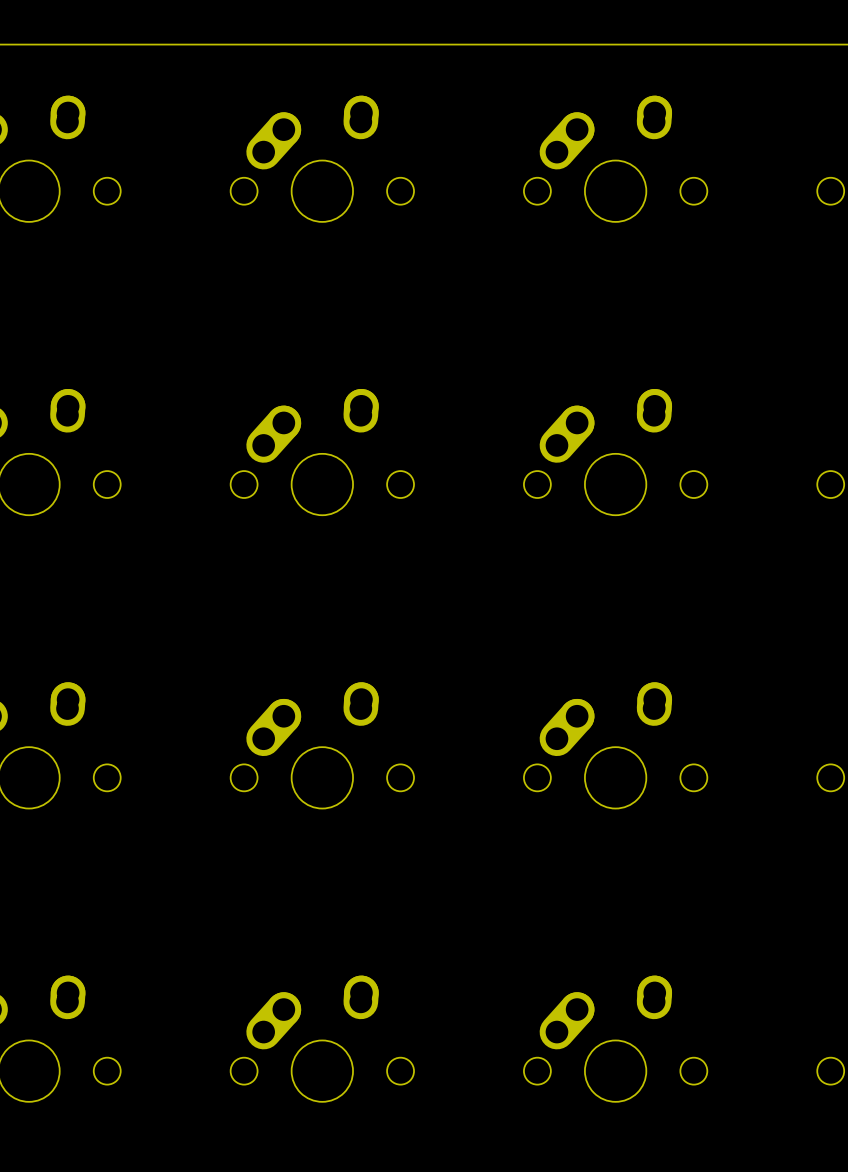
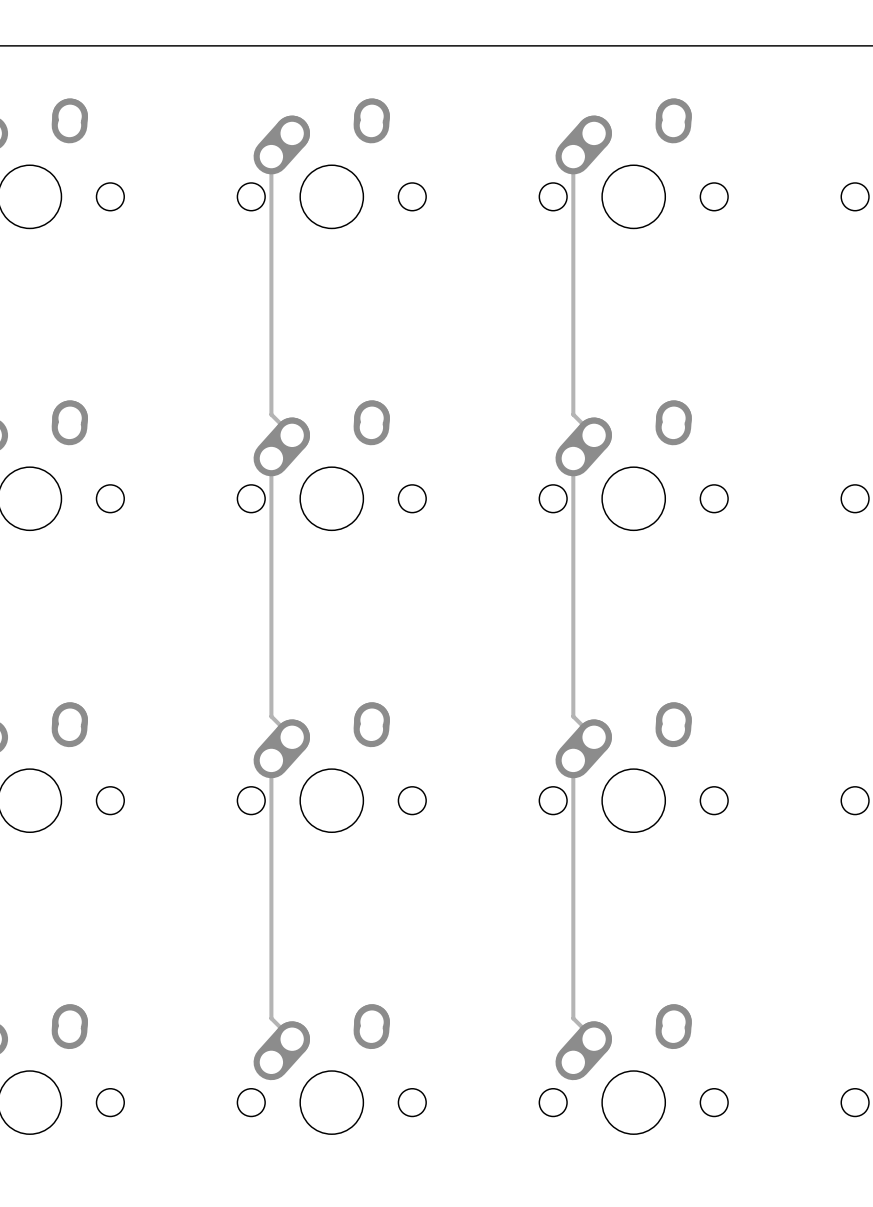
track: none -> (271, 156) (271, 414) (292, 435)
track: none -> (573, 156) (573, 414) (594, 435)
track: none -> (271, 458) (271, 716) (292, 737)
track: none -> (573, 458) (573, 716) (594, 737)
track: none -> (271, 760) (271, 1018) (292, 1039)
track: none -> (573, 760) (573, 1018) (594, 1039)

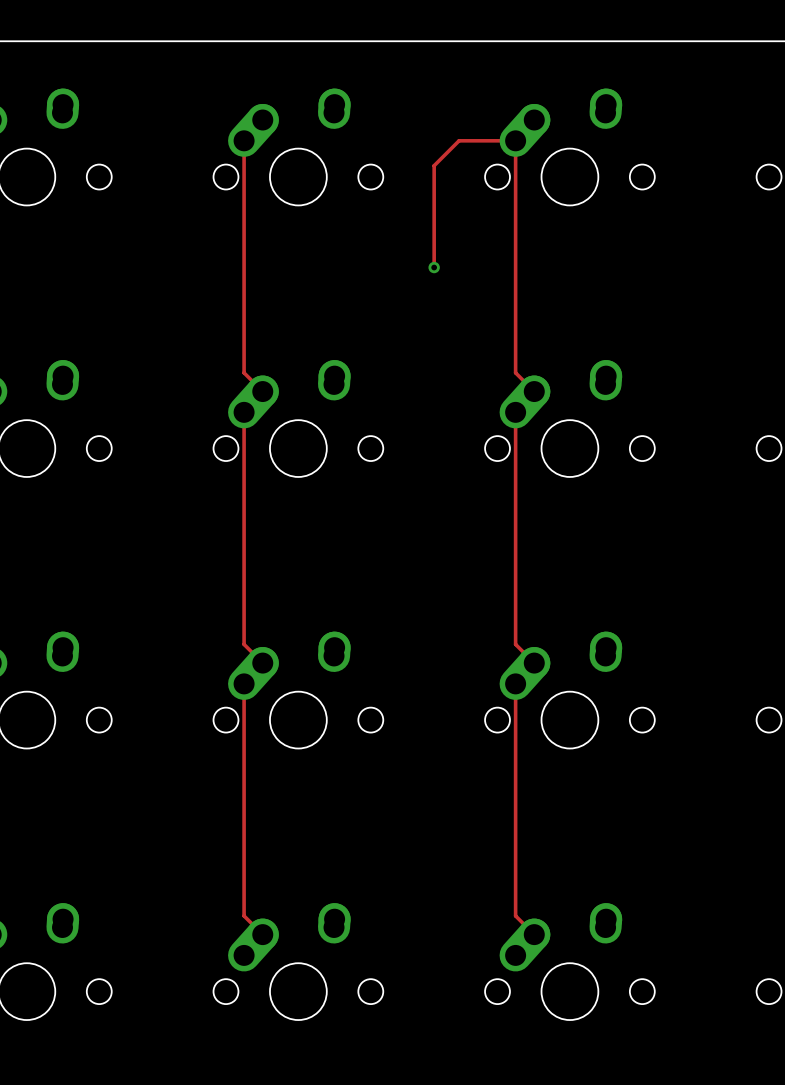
track: none -> (515, 140) (459, 140) (434, 165) (434, 267)
via: none -> (434, 267)

